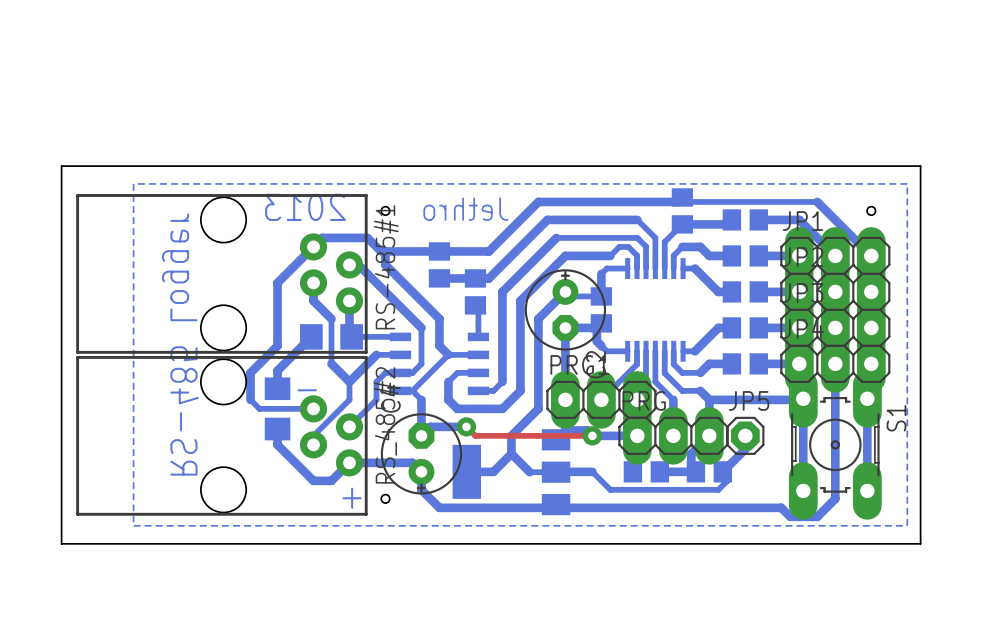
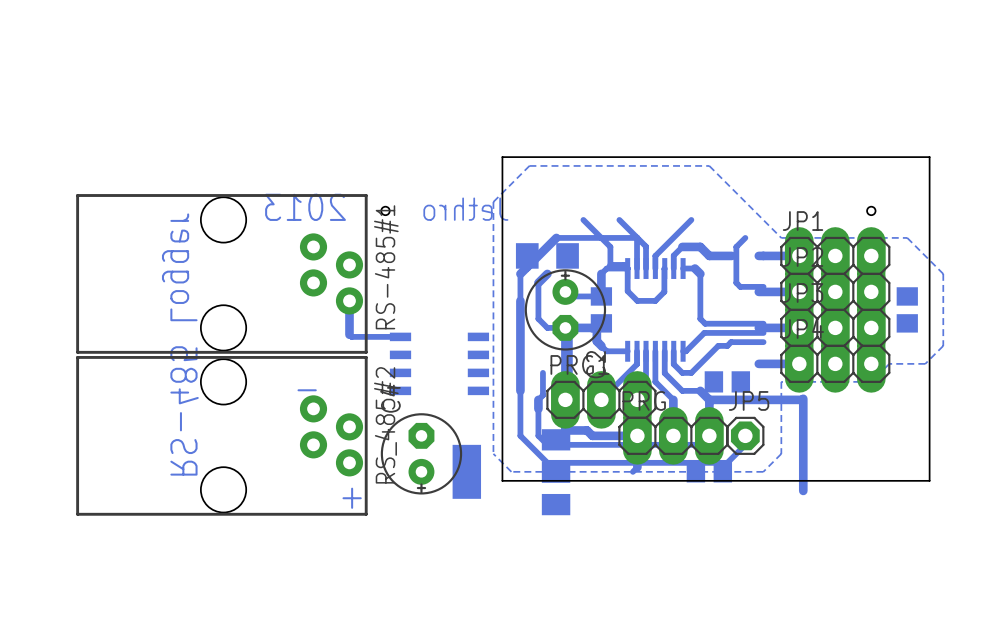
board edge: none -> (502, 157) (929, 157) (929, 480) (502, 480) (502, 157)
bottom zone outline: none -> (529, 165) (709, 165) (781, 237) (907, 237) (943, 273) (943, 345) (925, 363) (889, 363) (871, 381) (781, 381) (781, 453) (763, 471) (511, 471) (493, 453) (493, 201) (529, 165)
board edge: (61, 166) (920, 166) (920, 543) (61, 543) (61, 166) -> none
bottom zone outline: (133, 183) (133, 525) (907, 525) (907, 183) (133, 183) -> none
part: (682, 210) -> none
bottom track: (731, 219) (727, 224) (682, 224) (664, 242) (664, 268) -> (583, 219) (610, 246) (610, 264) (624, 264) (627, 268) (627, 291) (637, 300) (655, 300) (664, 291) (664, 268)
part: (745, 219) -> none
bottom track: (758, 219) (799, 219) (835, 255) -> none
bottom track: none -> (745, 237) (736, 246) (736, 282) (740, 286) (763, 286)
bottom track: (385, 251) (381, 251) (367, 237) (322, 237) (277, 282) (277, 345) (250, 372) (250, 399) (259, 408) (313, 408) -> none
bottom track: (385, 251) (488, 251) (538, 201) (677, 201) (682, 197) (686, 201) (817, 201) (871, 255) (871, 394) (867, 398) (867, 490) -> none
bottom track: (385, 251) (385, 264) (439, 318) (439, 345) (448, 354) -> none
part: none -> (547, 255)
bottom track: (637, 255) (628, 246) (619, 246) (610, 255) (565, 255) (547, 273) -> (637, 255) (637, 237) (619, 219)
bottom track: (655, 255) (655, 237) (637, 219) (547, 219) (488, 278) (439, 278) -> (655, 255) (691, 219)
part: (745, 255) -> none
bottom track: (835, 255) (835, 498) (817, 516) (790, 516) (781, 507) (559, 507) (556, 504) (552, 507) (439, 507) (421, 489) (421, 471) (412, 462) (349, 462) (331, 480) (313, 480) (277, 444) (277, 429) -> none
bottom track: (349, 264) (358, 264) (421, 327) (421, 363) (412, 372) (385, 372) (376, 381) (376, 399) (349, 426) -> none
part: (439, 264) -> none
bottom track: (520, 273) (502, 291) (502, 381) (493, 390) (478, 390) -> none
bottom track: (700, 273) (718, 291) (731, 291) -> (700, 273) (700, 318) (705, 323) (763, 323)
bottom track: (313, 282) (313, 300) (331, 318) (331, 363) (349, 381) -> none
bottom track: (538, 282) (520, 300) -> (520, 273) (520, 300)
bottom track: none -> (538, 282) (538, 318) (547, 327) (565, 327) (569, 332) (569, 372)
part: (475, 291) -> none
bottom track: (565, 291) (538, 318) (538, 399) -> (542, 372) (542, 395) (538, 399)
part: (745, 291) -> none
bottom track: (475, 305) (478, 308) (478, 336) -> none
part: none -> (907, 309)
bottom track: (731, 327) (718, 327) (694, 351) (685, 351) -> (763, 332) (704, 332) (685, 351)
part: (745, 327) -> none
bottom track: (311, 336) (277, 370) (277, 388) -> none
part: (331, 336) -> none
bottom track: (400, 354) (376, 354) (349, 381) -> none
bottom track: (448, 354) (478, 354) -> none
bottom track: (448, 354) (412, 390) -> none
bottom track: (731, 363) (709, 363) (700, 372) (691, 372) -> (763, 342) (731, 342) (727, 345) (718, 345) (691, 372)
part position: (745, 363) -> (727, 381)
bottom track: (478, 372) (457, 372) (448, 381) (448, 399) (457, 408) (502, 408) (520, 390) -> none
bottom track: (349, 381) (349, 399) (313, 435) (313, 444) -> none
bottom track: (412, 390) (421, 399) (421, 435) (430, 426) (466, 426) -> none
part: (277, 408) -> none
bottom track: (538, 408) (511, 435) (511, 453) -> none
top track: (466, 426) (475, 435) (592, 435) -> none
via: (466, 426) -> none
via: (592, 435) -> none
bottom track: (700, 444) (691, 453) (691, 467) (695, 471) (659, 471) -> (700, 444) (547, 444) (538, 435) (538, 408)
bottom track: (745, 444) (745, 449) (722, 471) (727, 476) (727, 480) (718, 489) (610, 489) (592, 471) (529, 472) (511, 453) -> (745, 444) (727, 462) (547, 462) (520, 435) (520, 390)
S1: (835, 444) -> none
bottom track: (511, 453) (493, 471) (466, 471) -> none
part: (646, 471) -> none
hole: (385, 498) -> none

